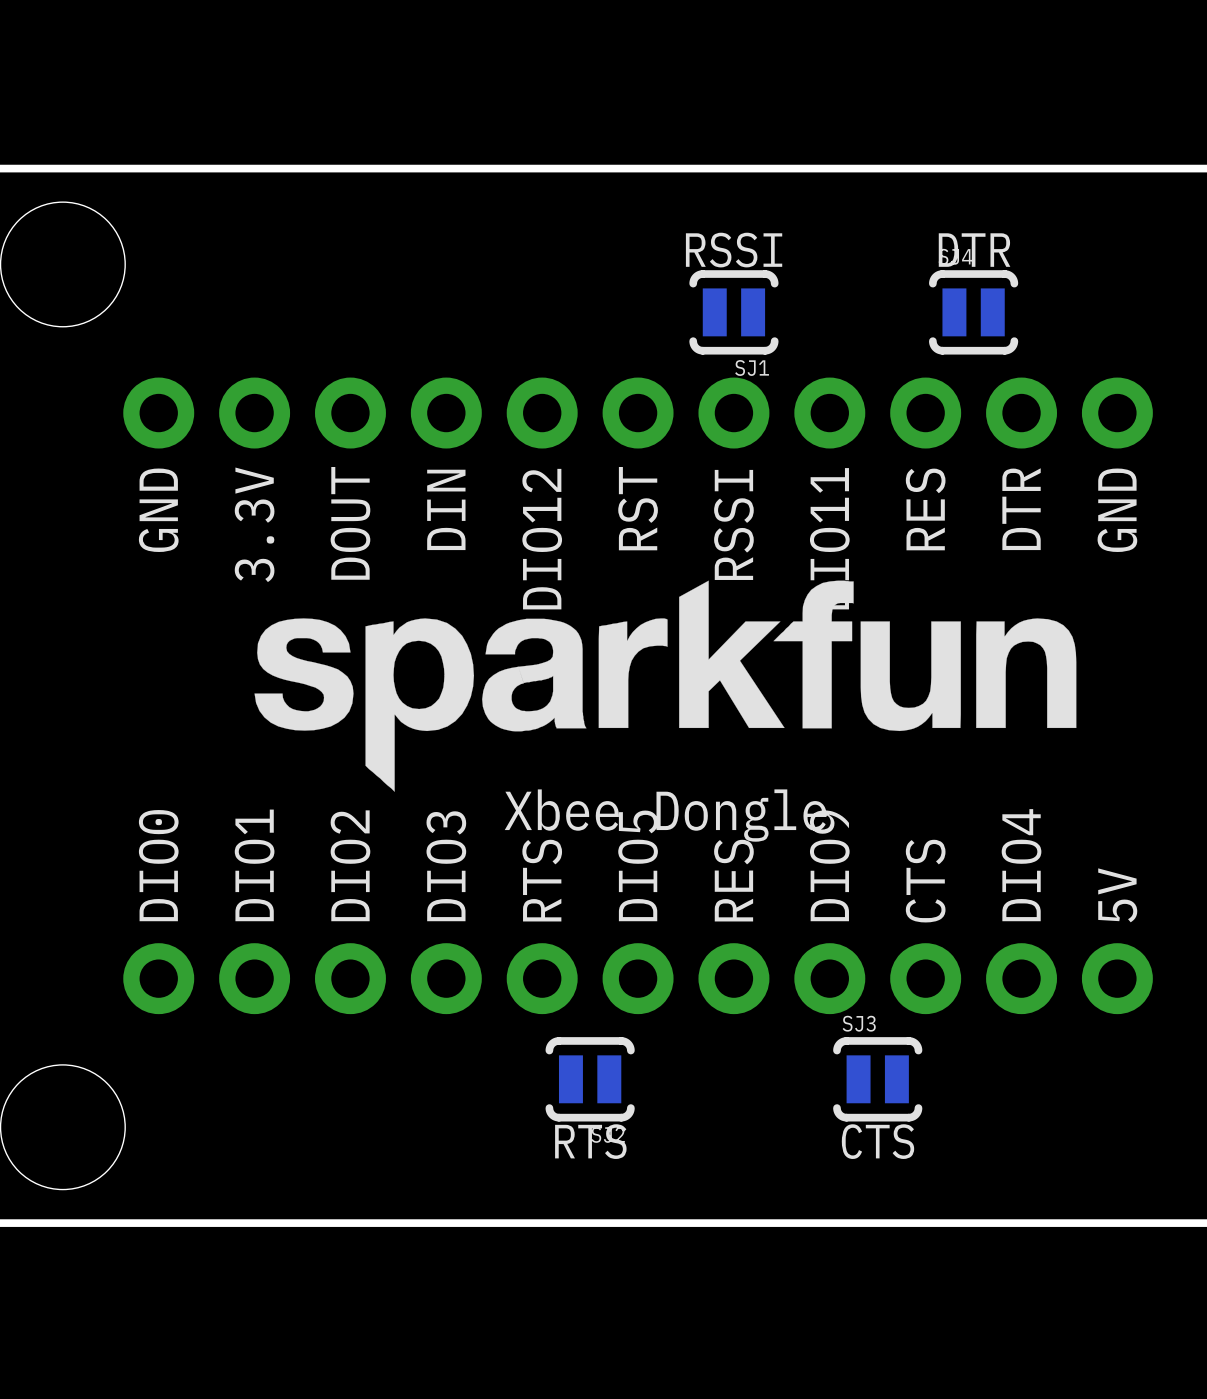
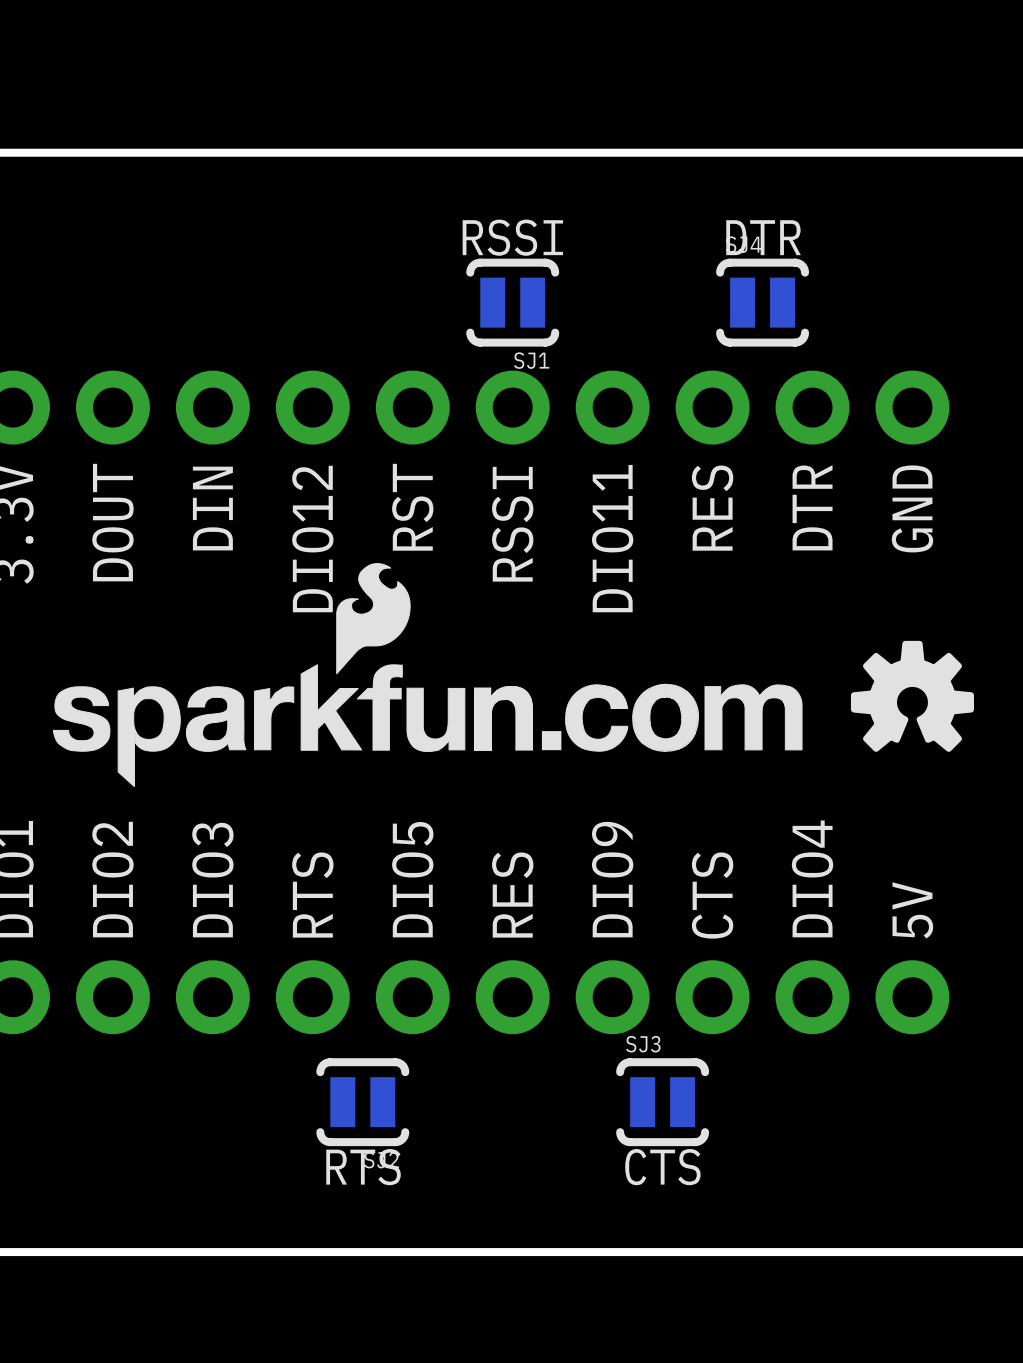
drawing shape: [254, 580, 1077, 792] -> [52, 563, 803, 788]
drawing: none -> [850, 640, 975, 752]
text: Xbee Dongle (665, 815) -> none

